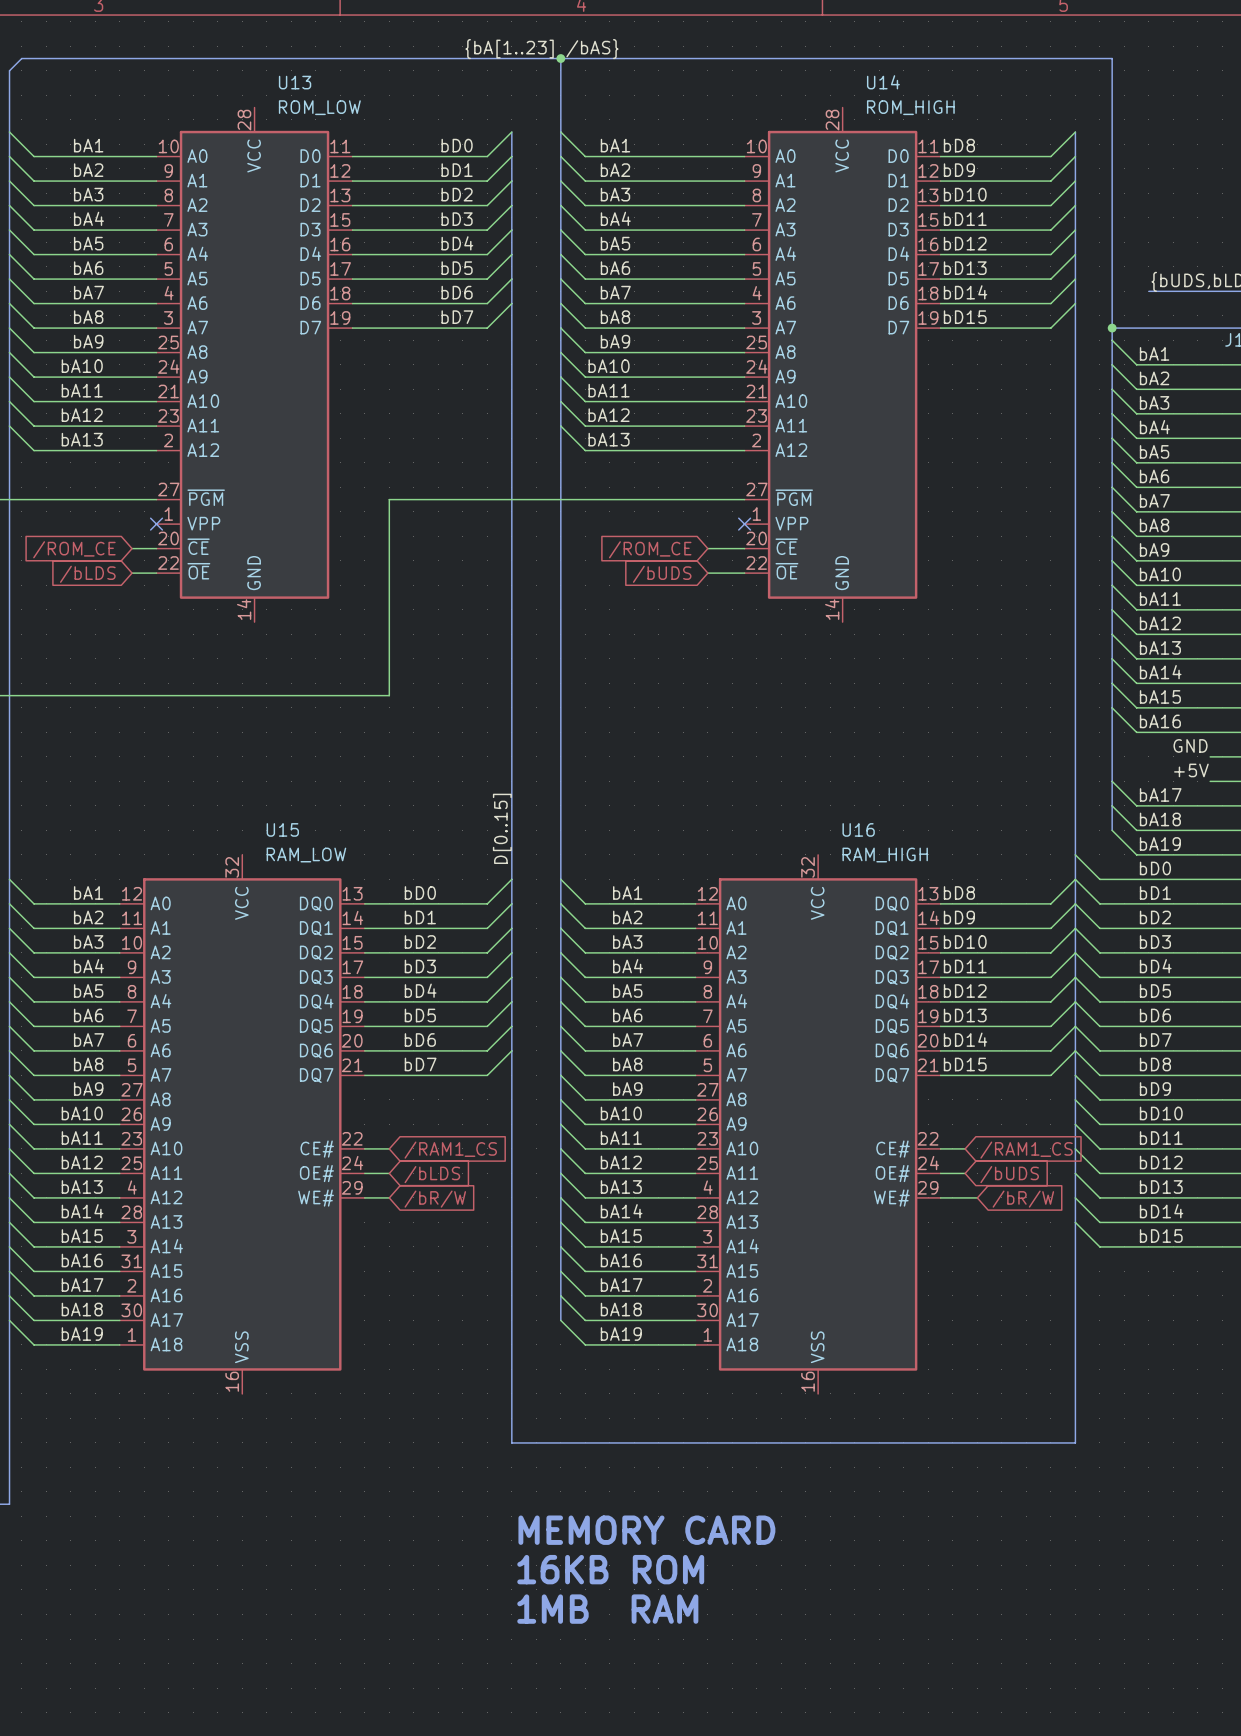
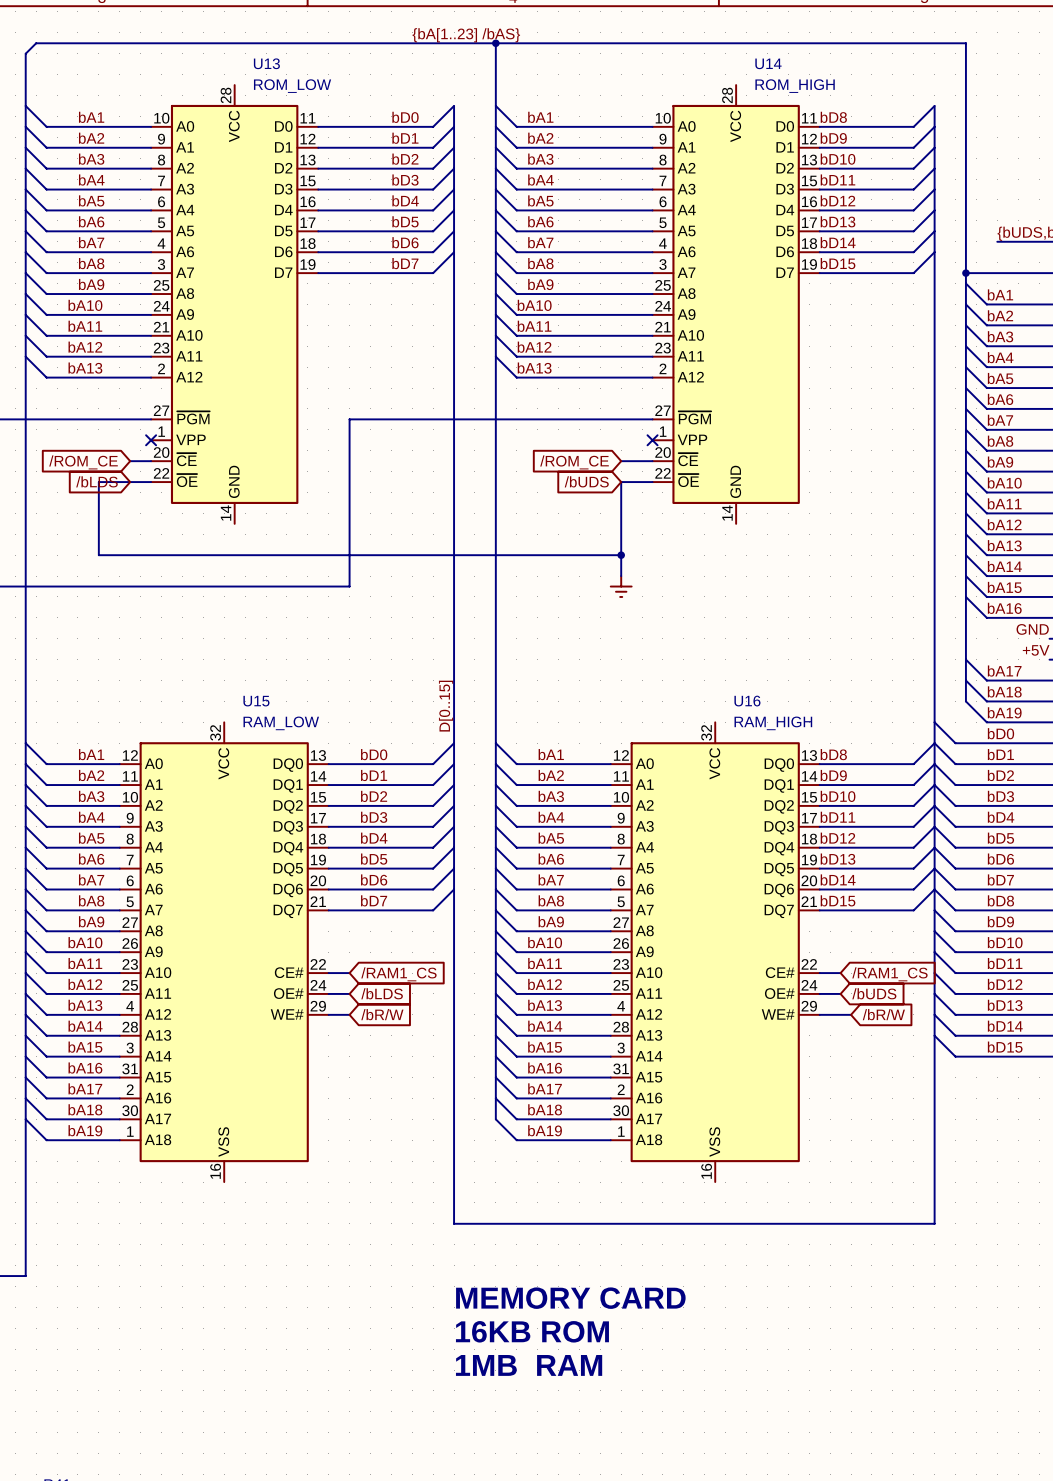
wire: none -> (130, 482) (98, 482) (98, 555) (621, 555)
wire: none -> (621, 482) (621, 576)
junction: none -> (621, 555)
power symbol: none -> (621, 586)

